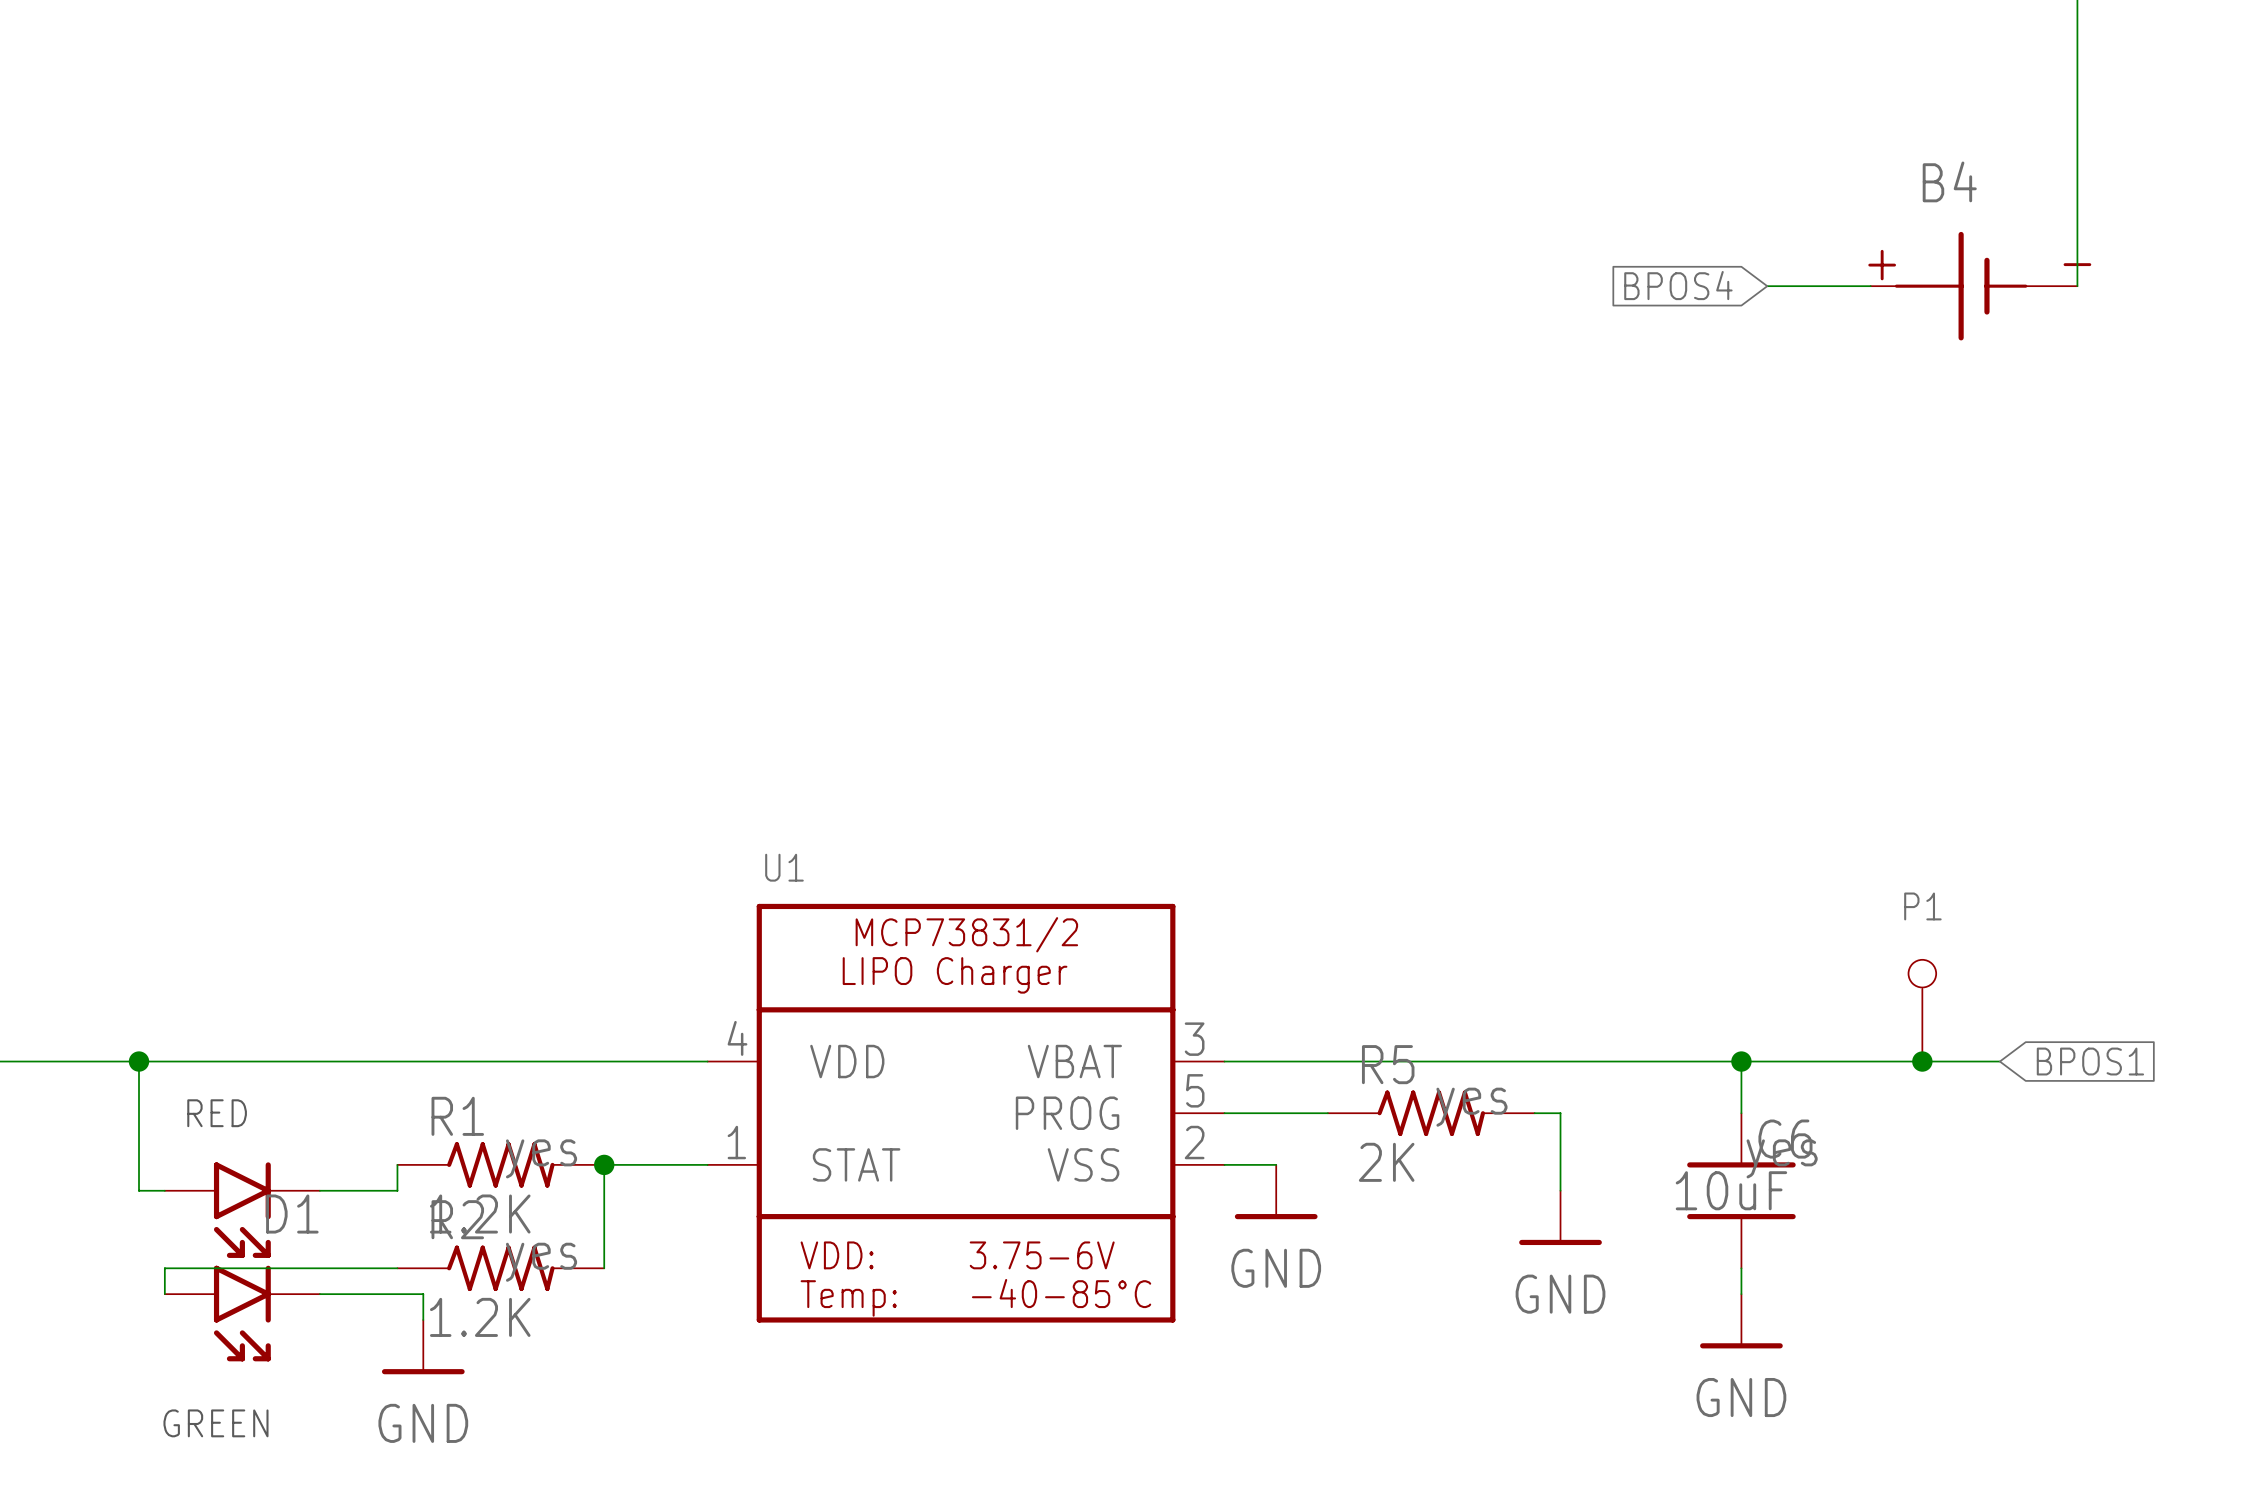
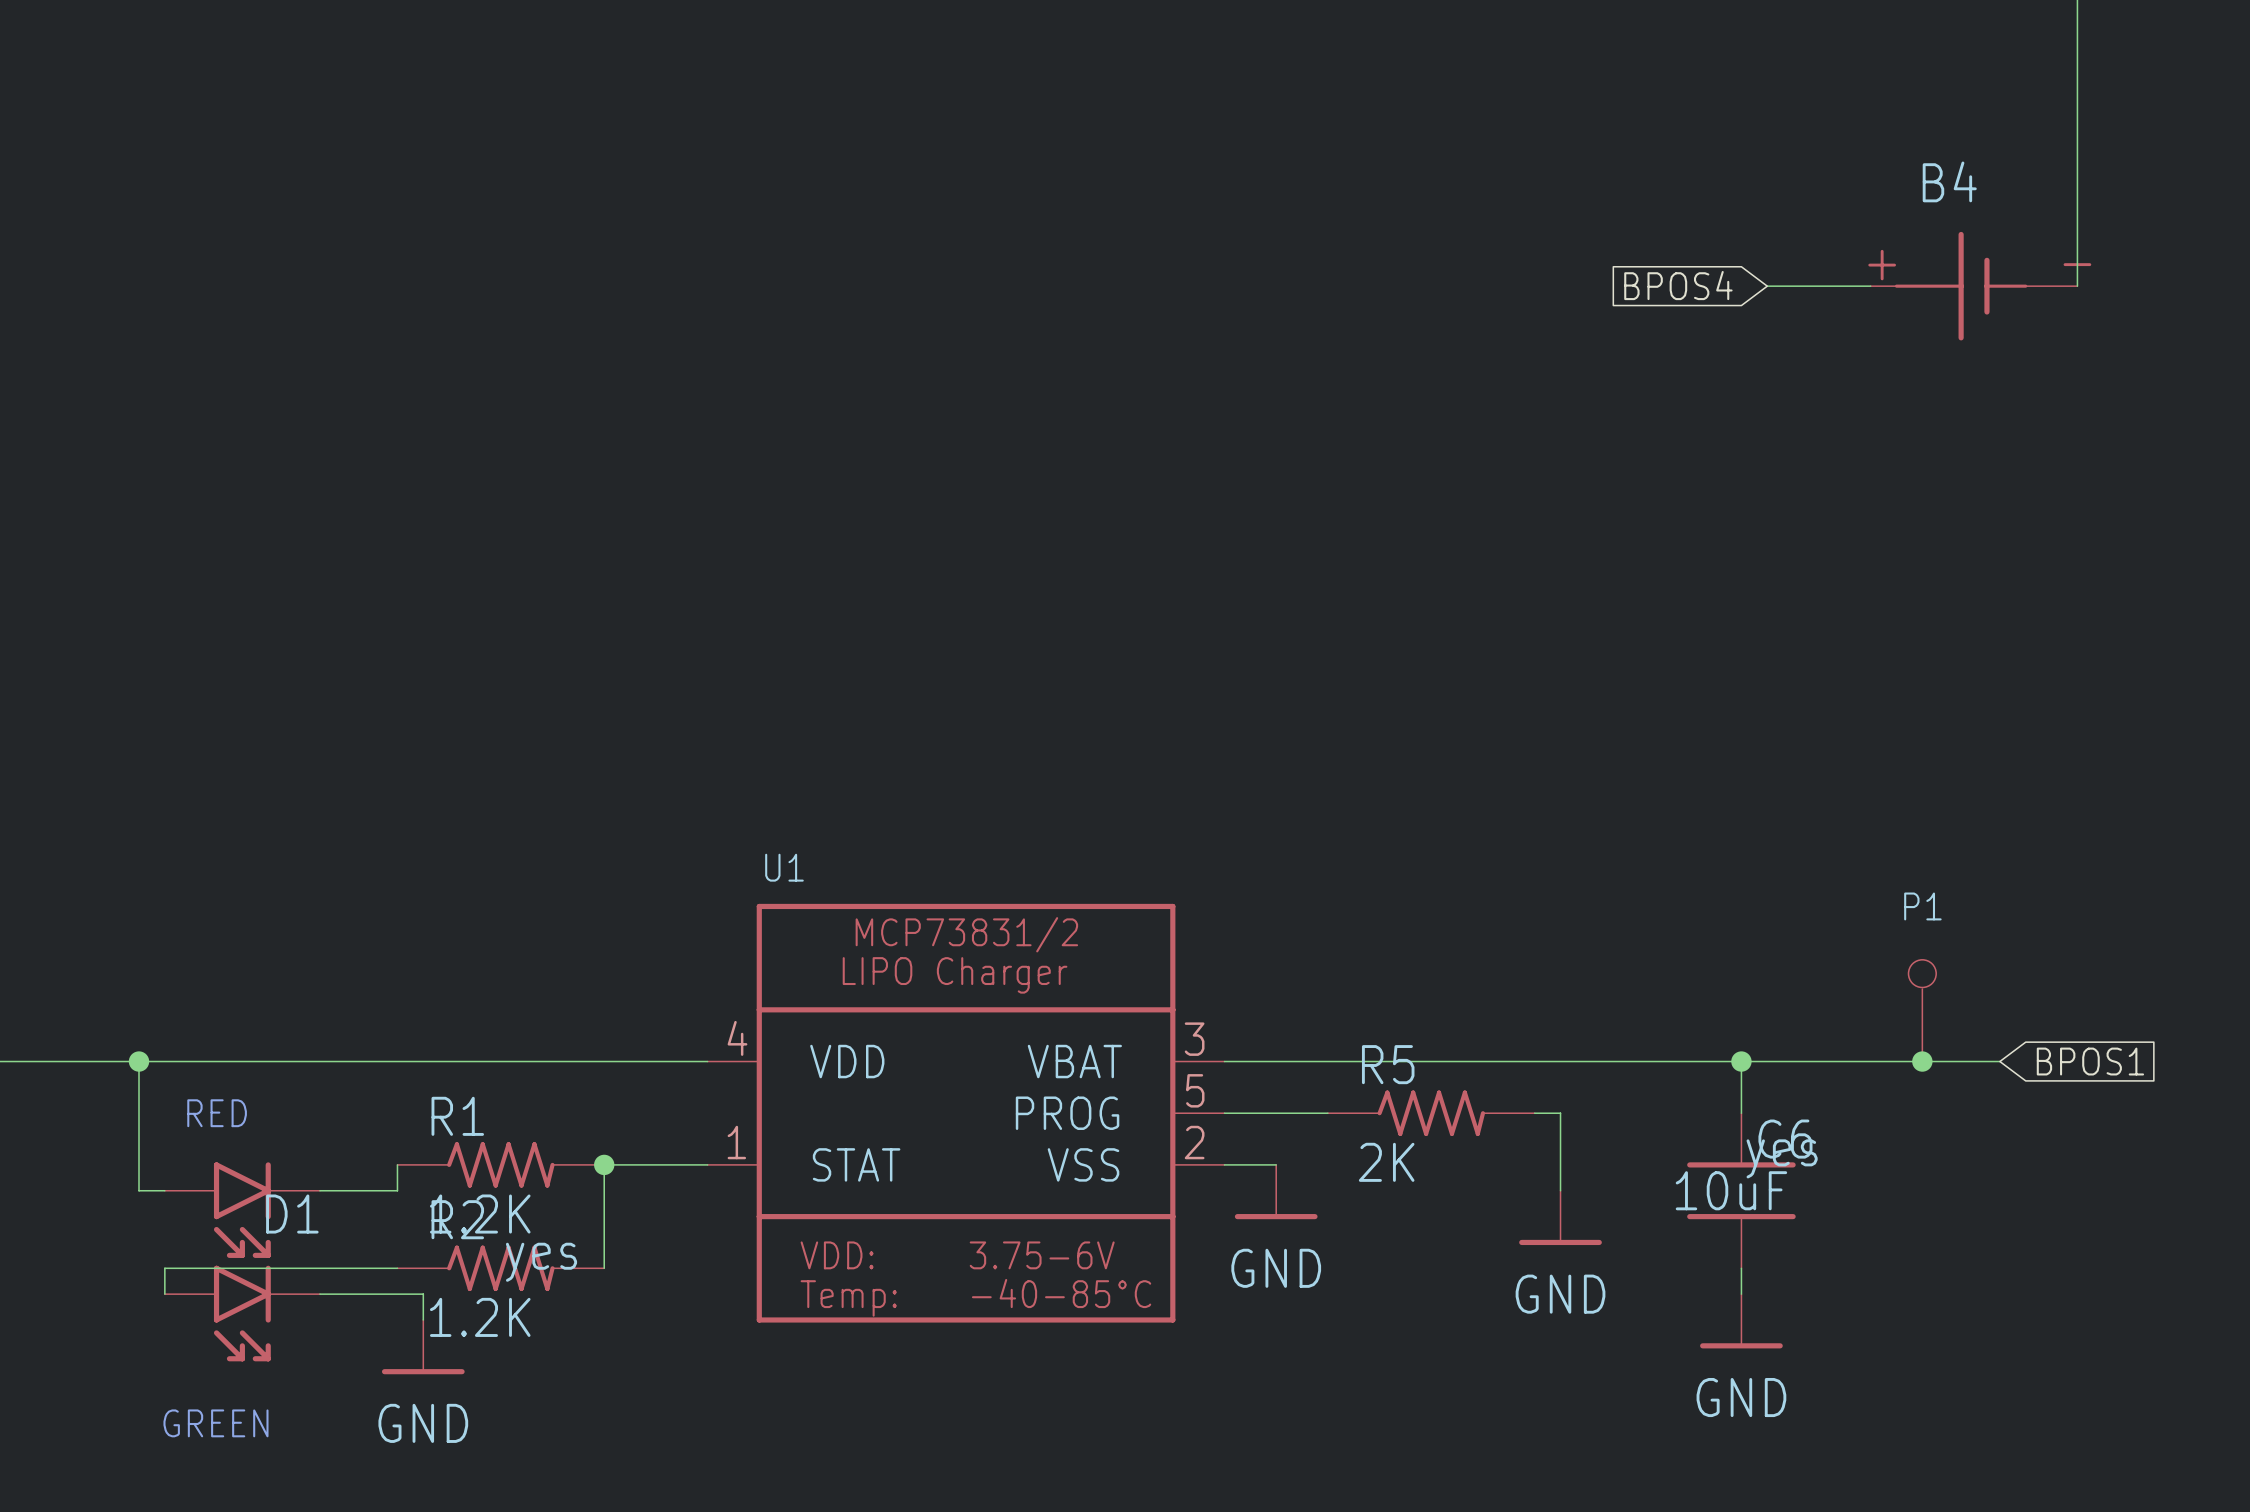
R5 text: yes (1471, 1107) -> none
R1 text: yes (541, 1158) -> none

